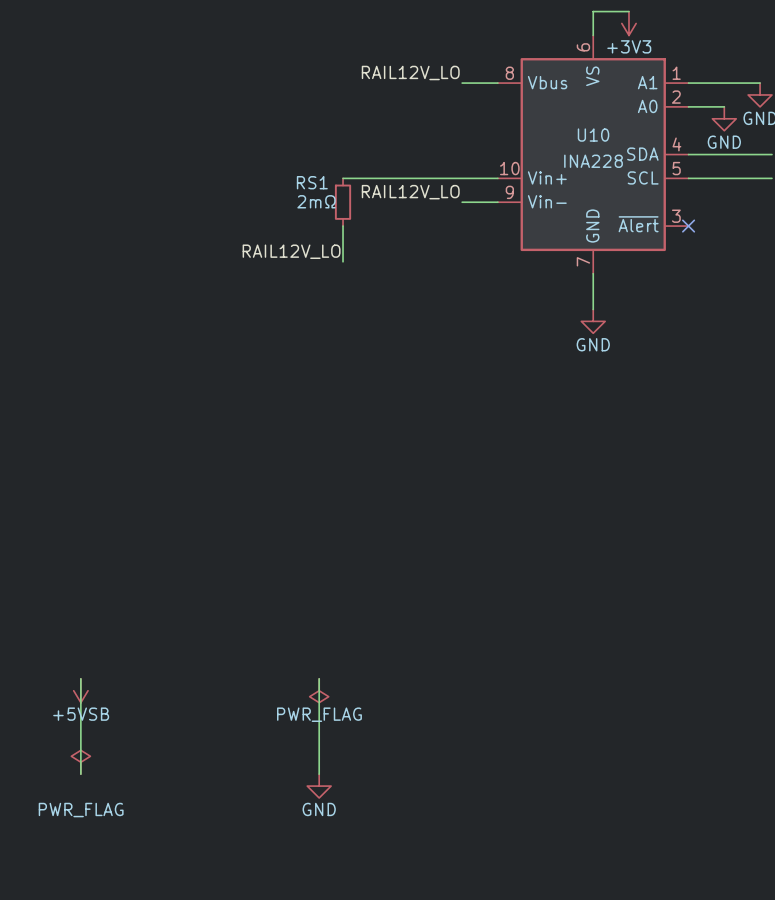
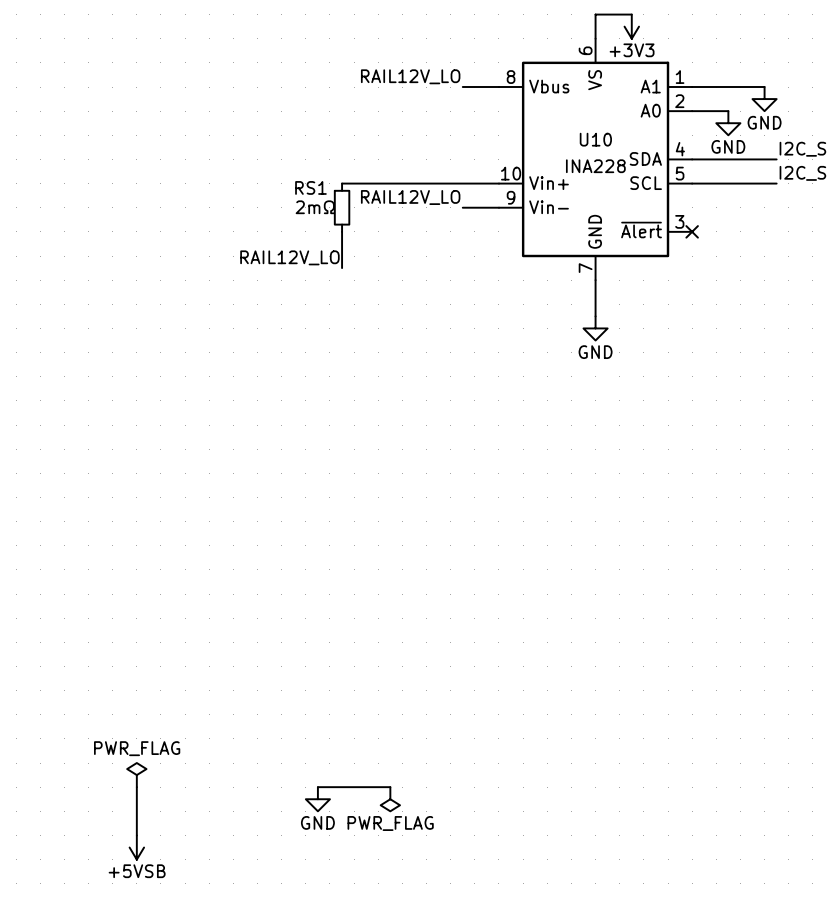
wire: (80, 678) (80, 774) -> none
wire: (319, 678) (319, 774) -> (390, 787) (317, 787)
power symbol position: +5VSB (80, 690) -> +5VSB (136, 847)
power symbol: PWR_FLAG (319, 690) -> none
power symbol position: PWR_FLAG (80, 762) -> PWR_FLAG (136, 775)
wire: none -> (136, 787) (136, 835)
power symbol: none -> PWR_FLAG (390, 799)
power symbol text position: PWR_FLAG (81, 810) -> PWR_FLAG (137, 748)

